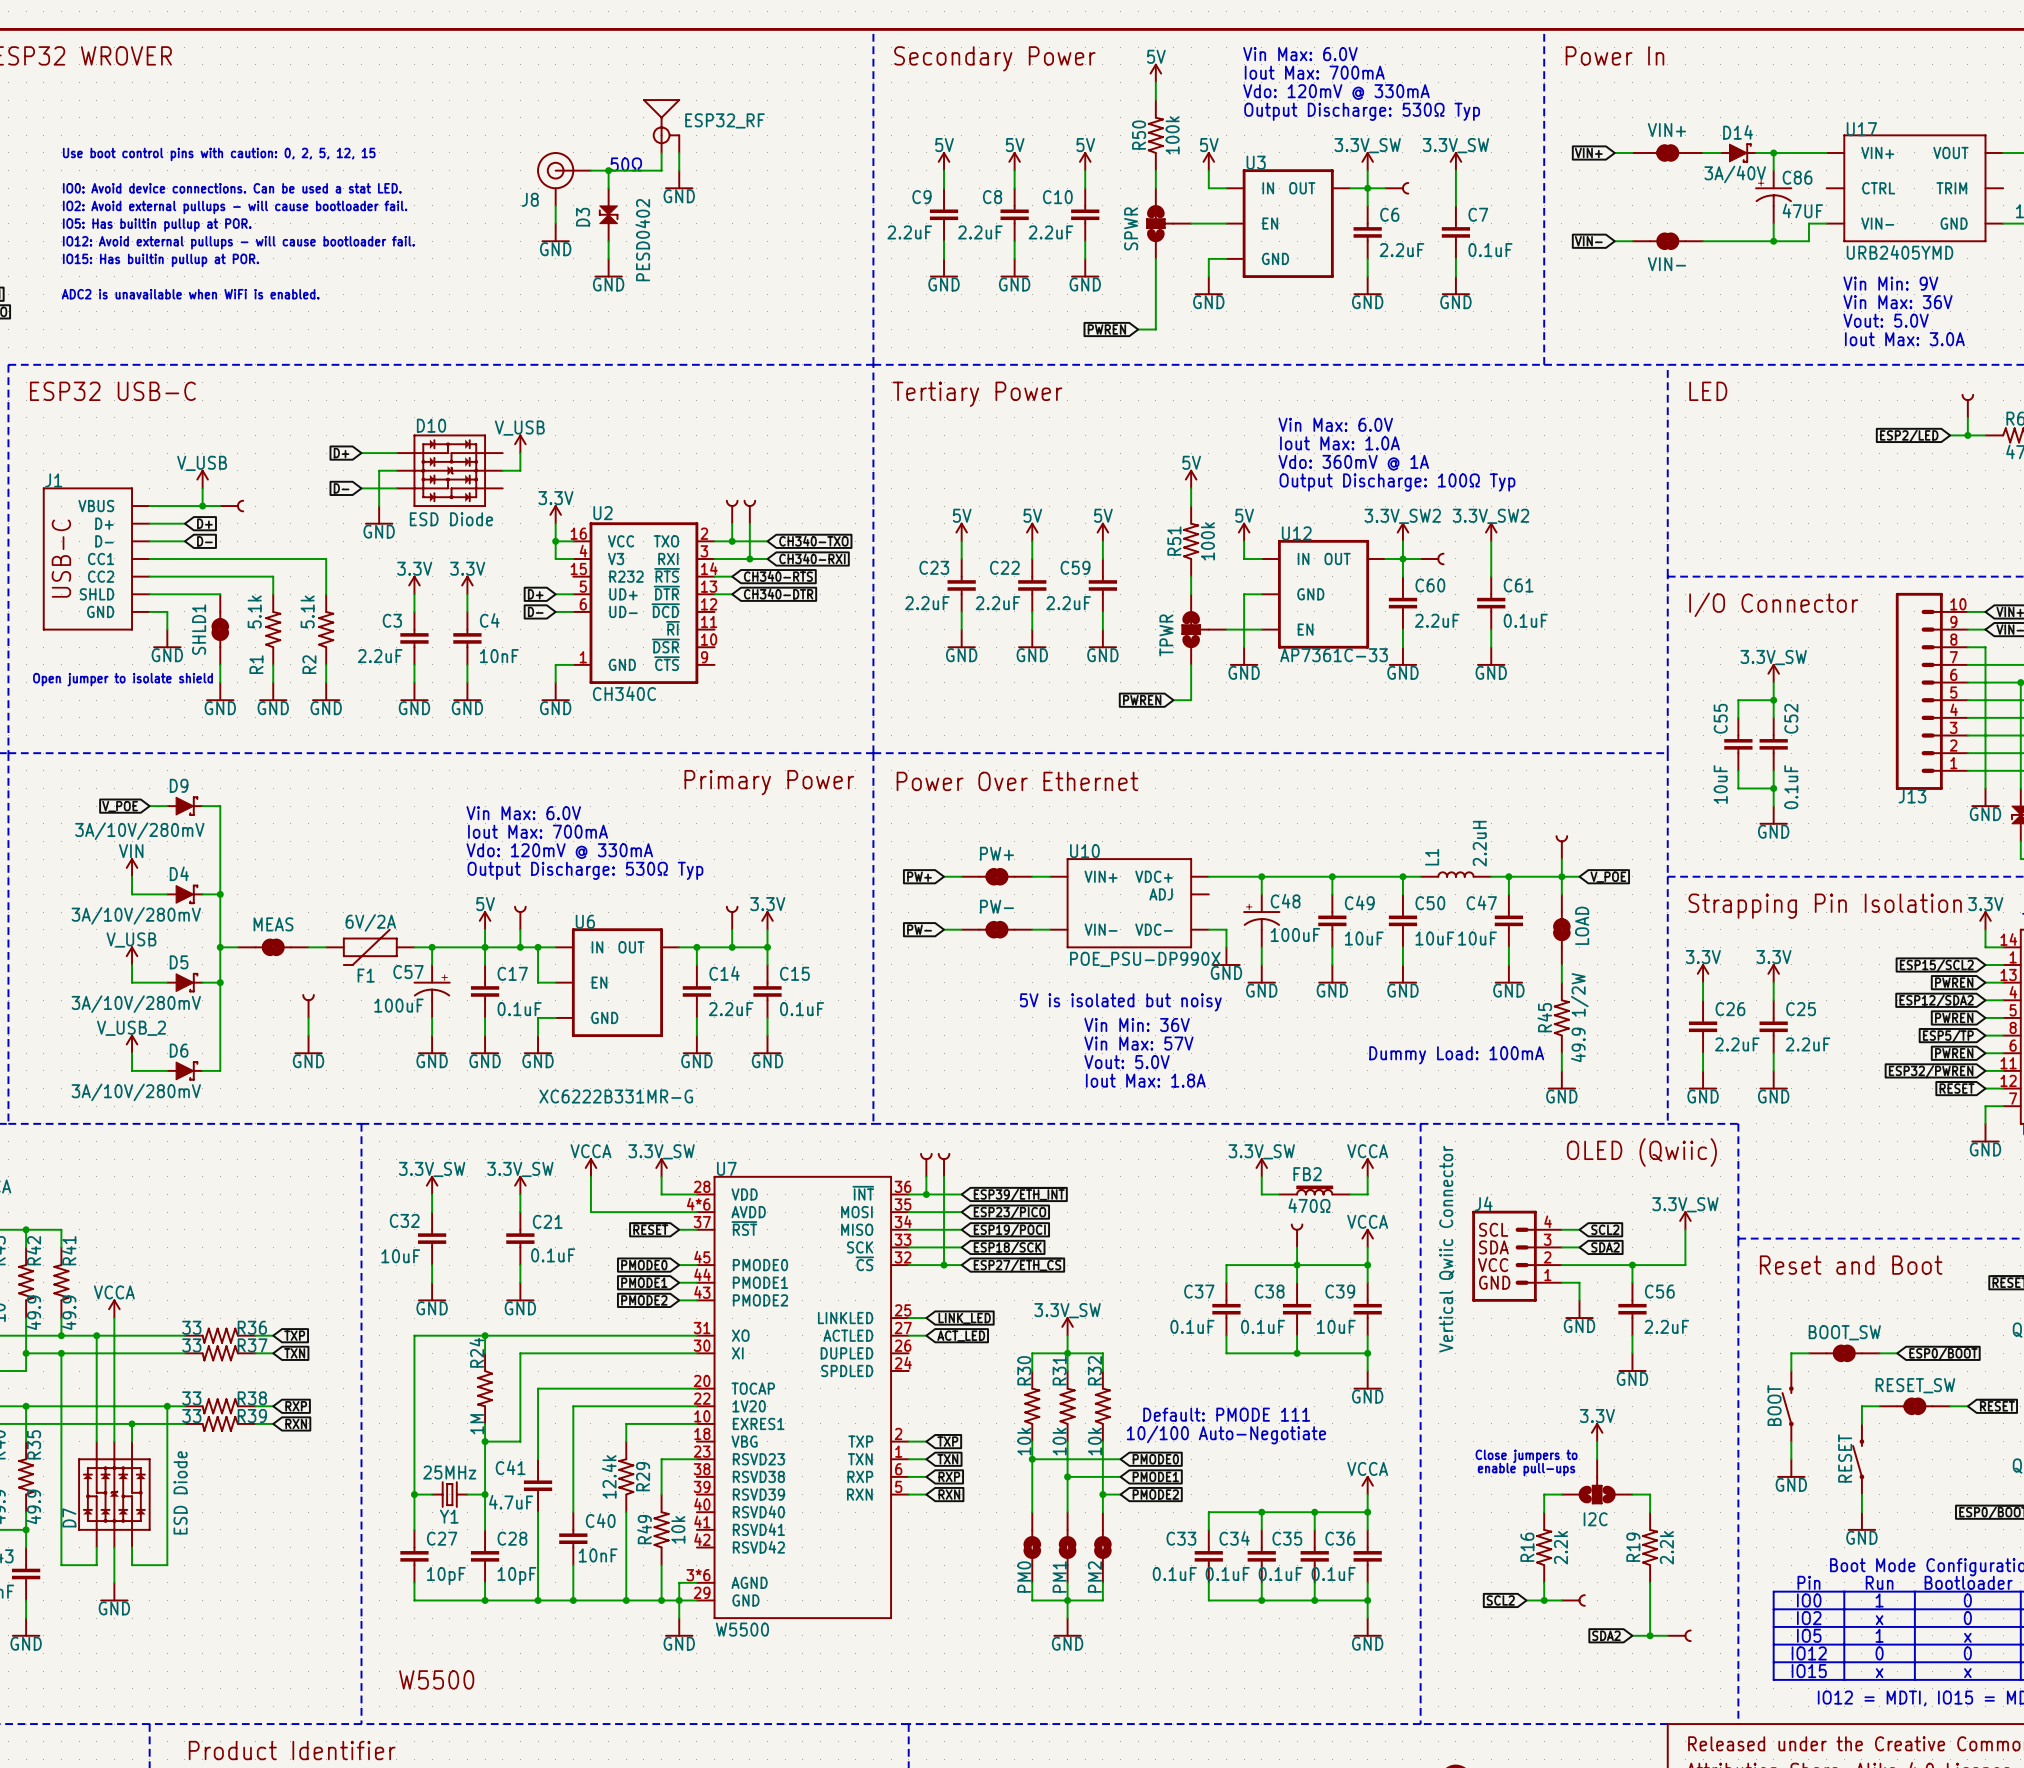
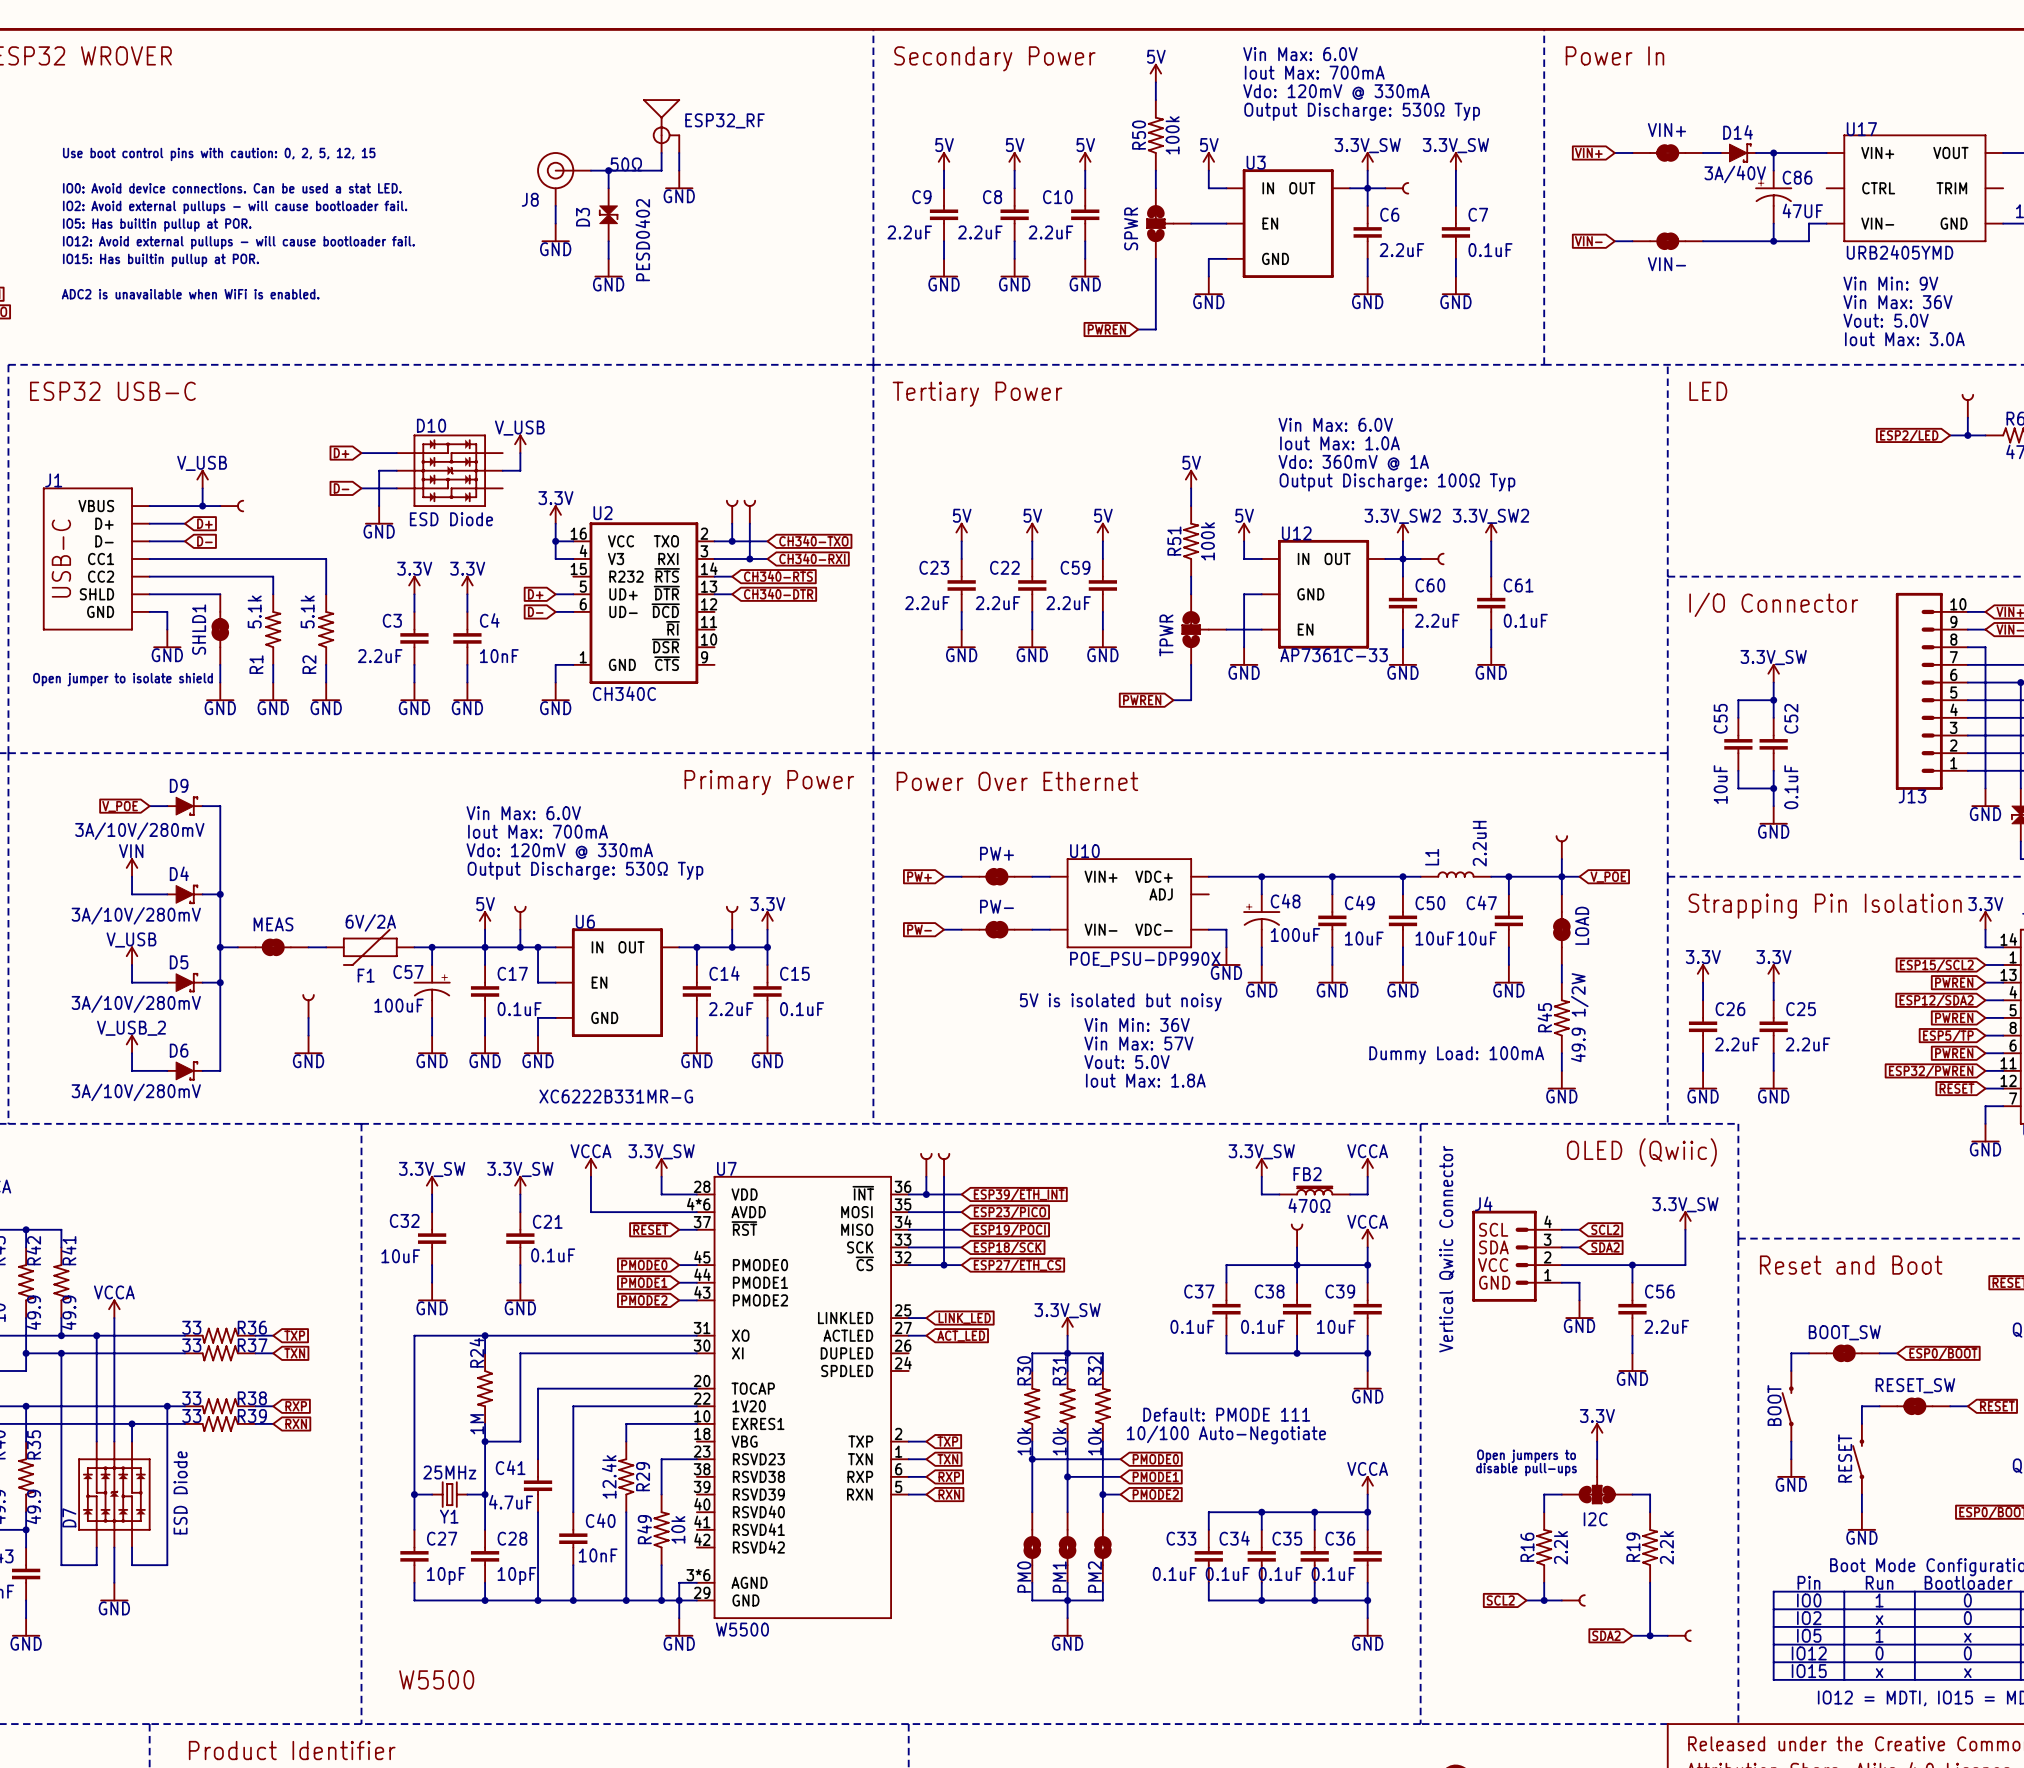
text: Close jumpers to (1526, 1456) -> Open jumpers to (1526, 1456)
I2C symbol: [1561, 1459, 1633, 1504] -> [1561, 1459, 1633, 1504]
text: enable pull-ups (1526, 1469) -> disable pull-ups (1526, 1469)

